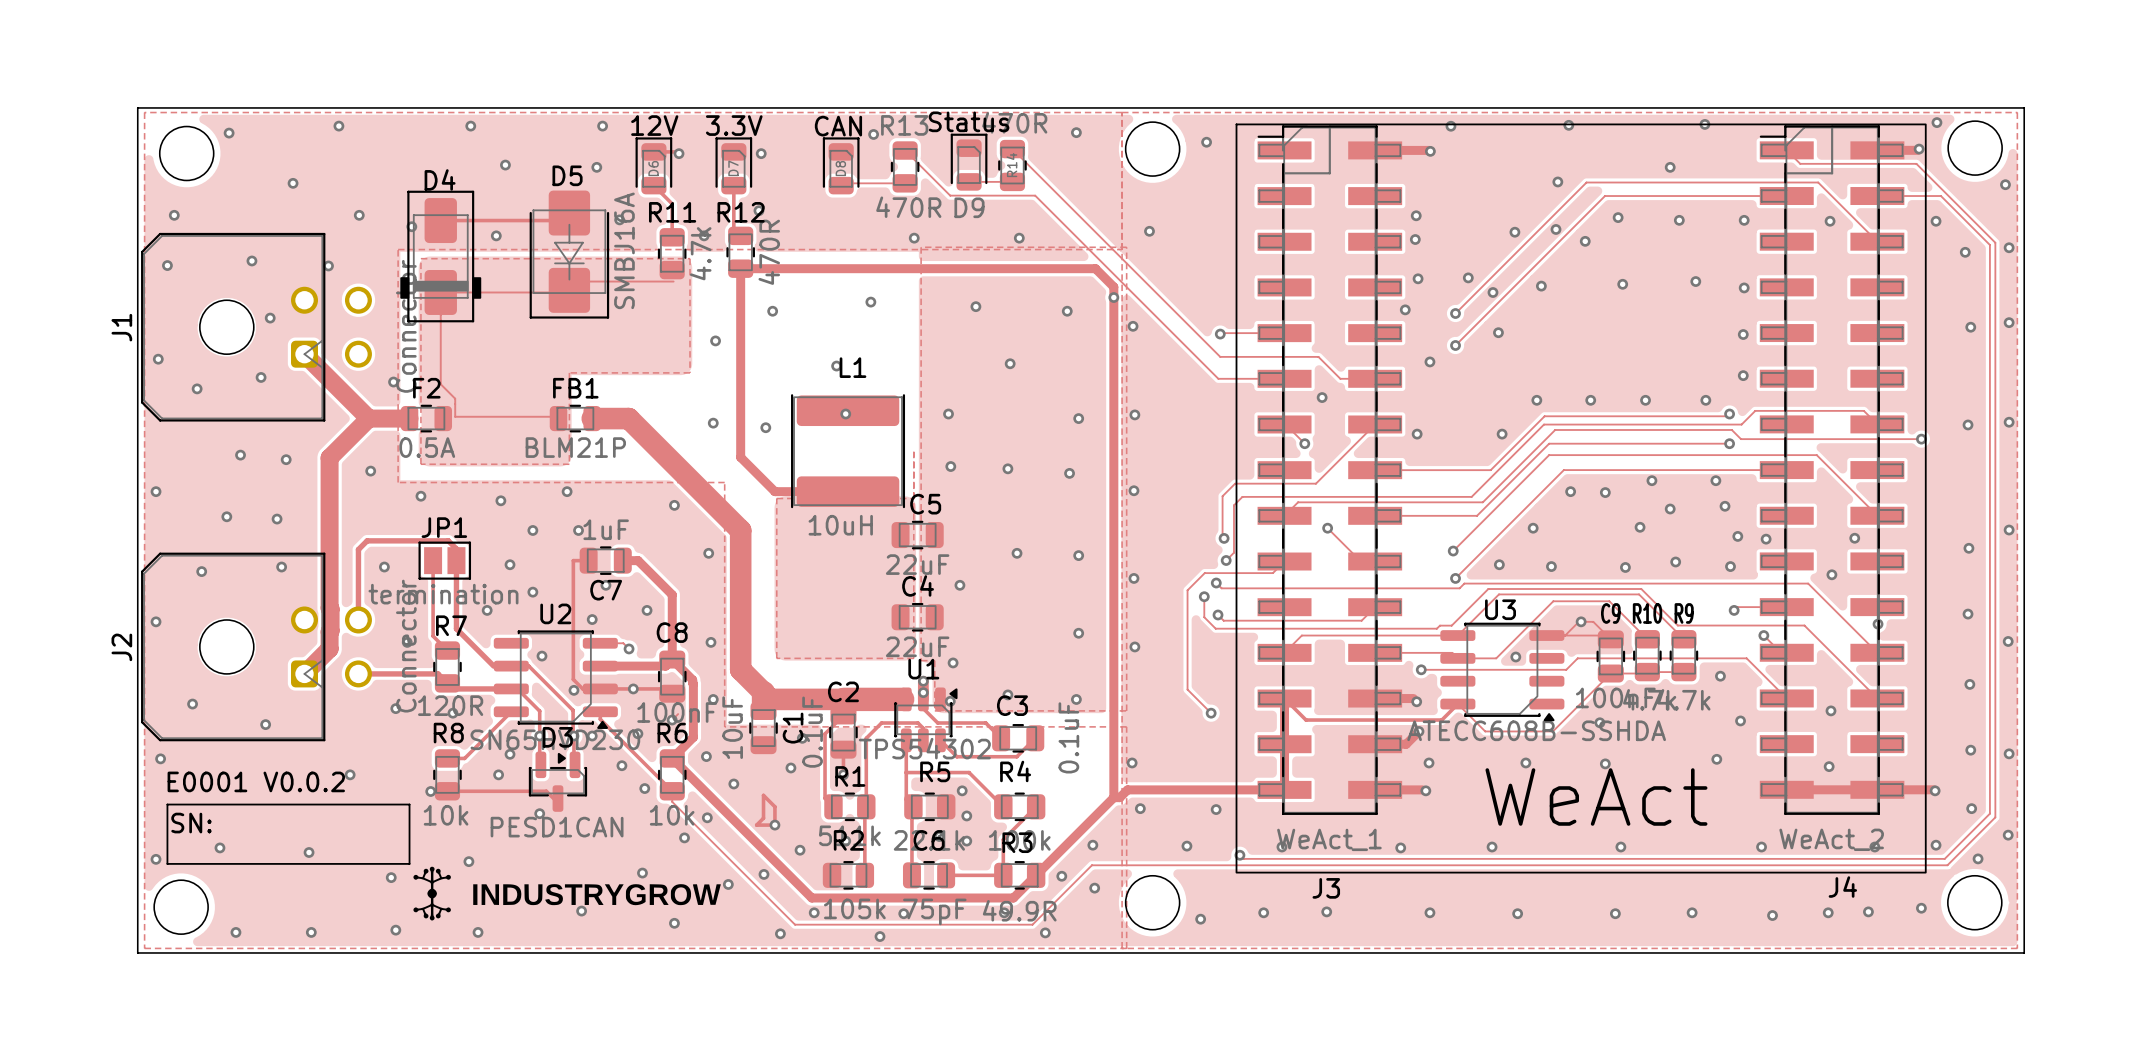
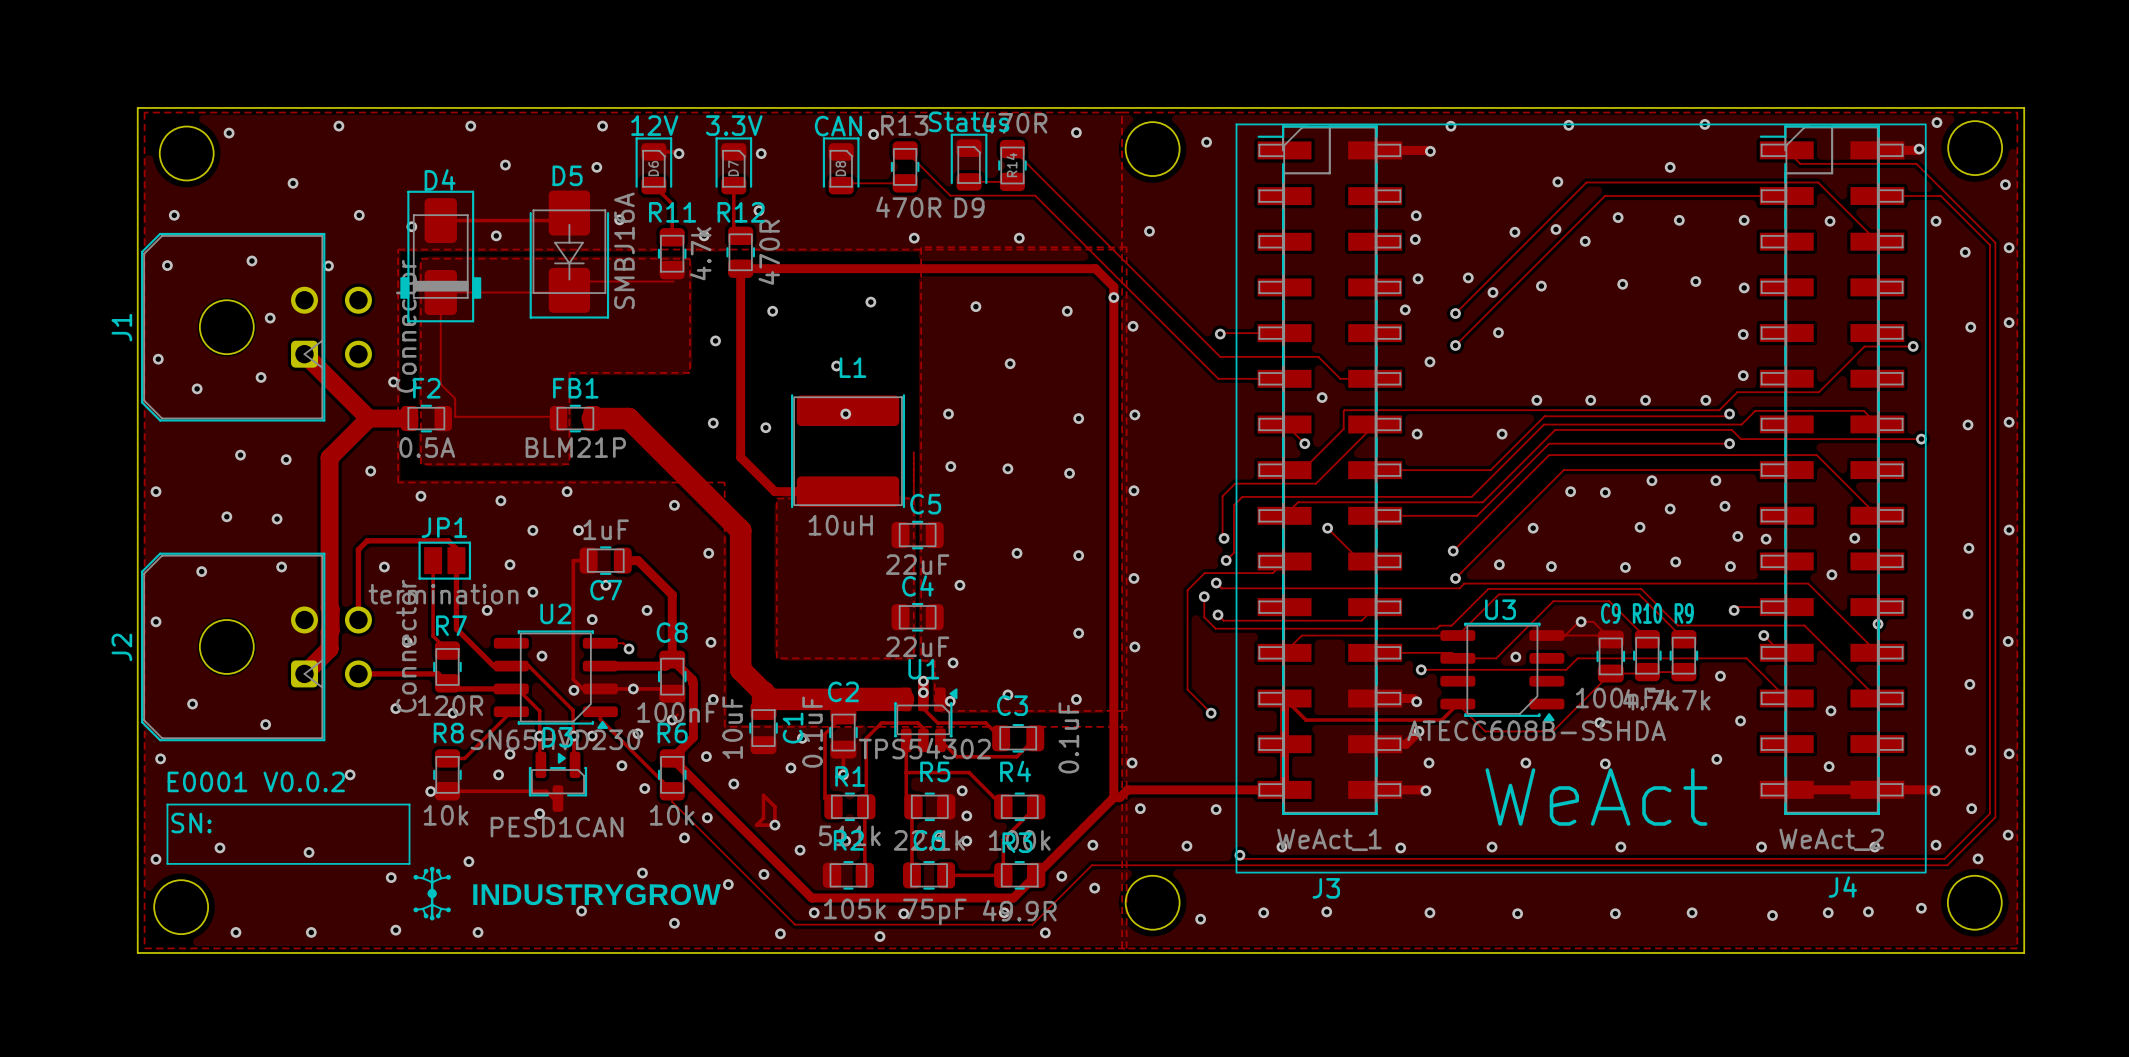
track: none -> (1913, 346) (1864, 346) (1818, 392) (1737, 392) (1719, 410) (1344, 410) (1343, 428) (1302, 470) (1284, 470)
via: none -> (1913, 346)

